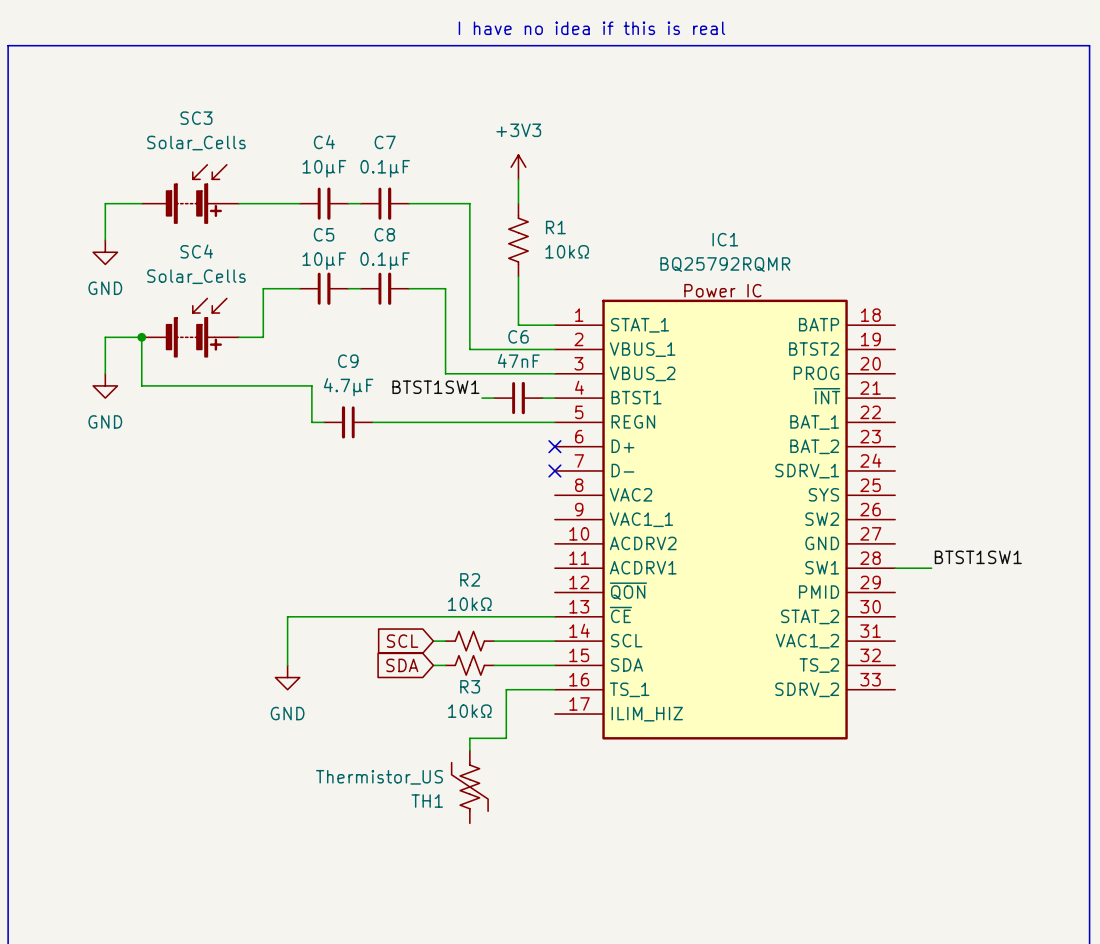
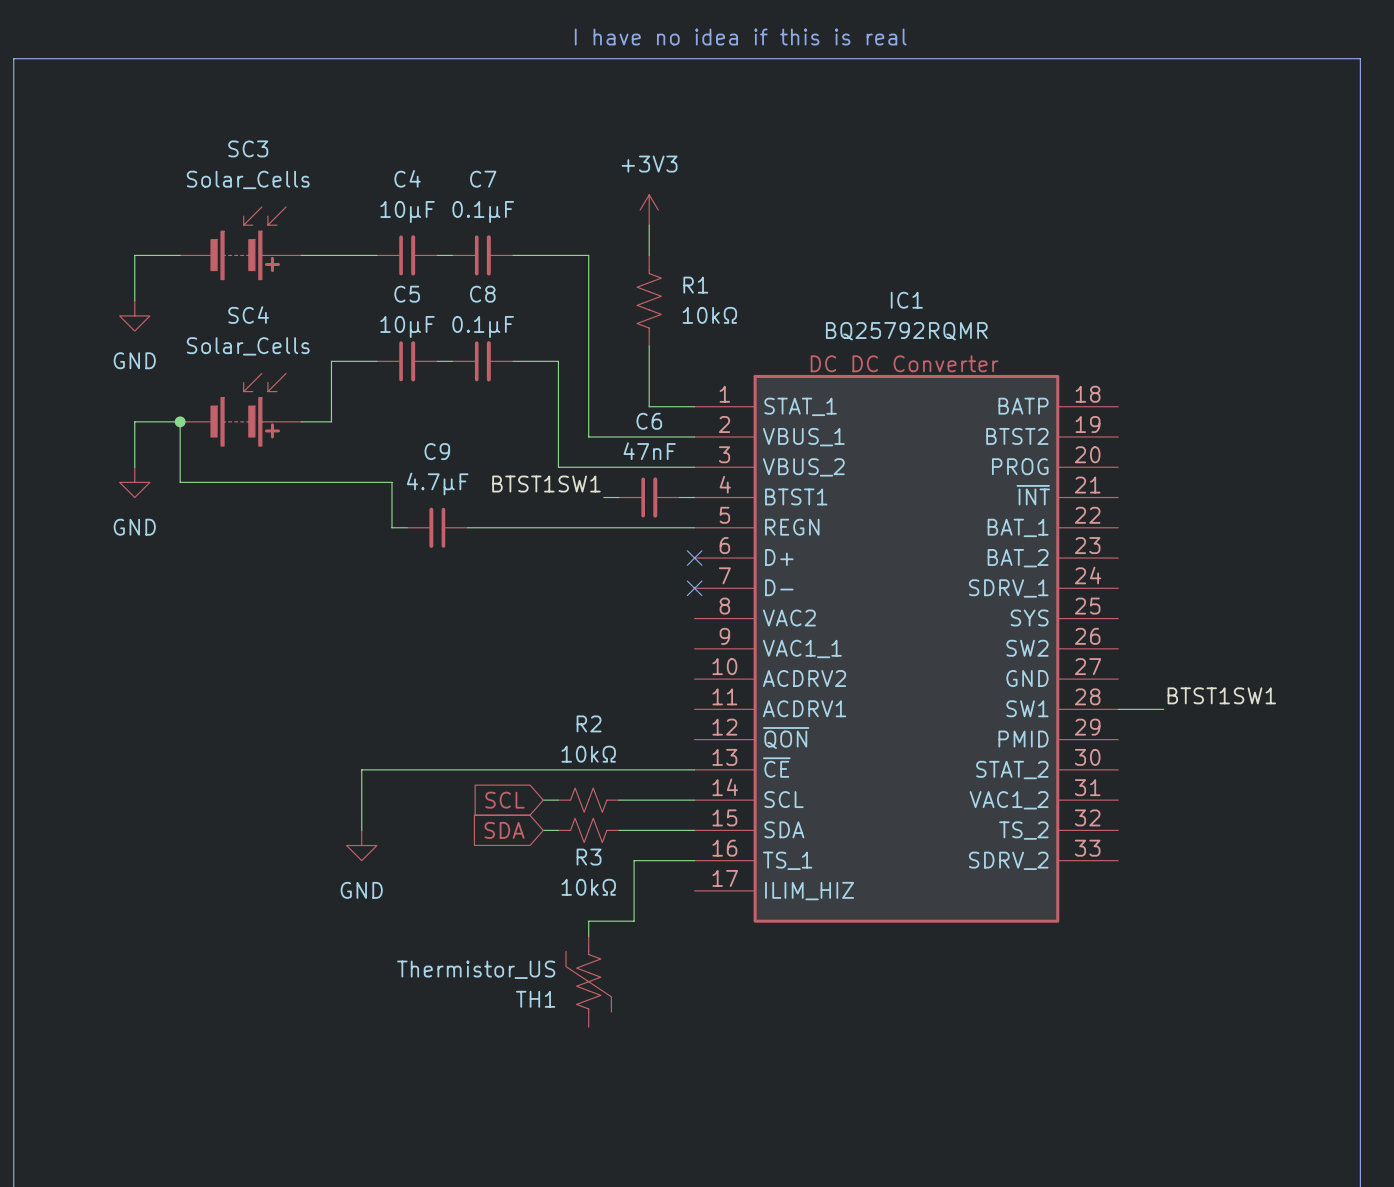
IC1 text: Power IC (722, 290) -> DC DC Converter (904, 363)

